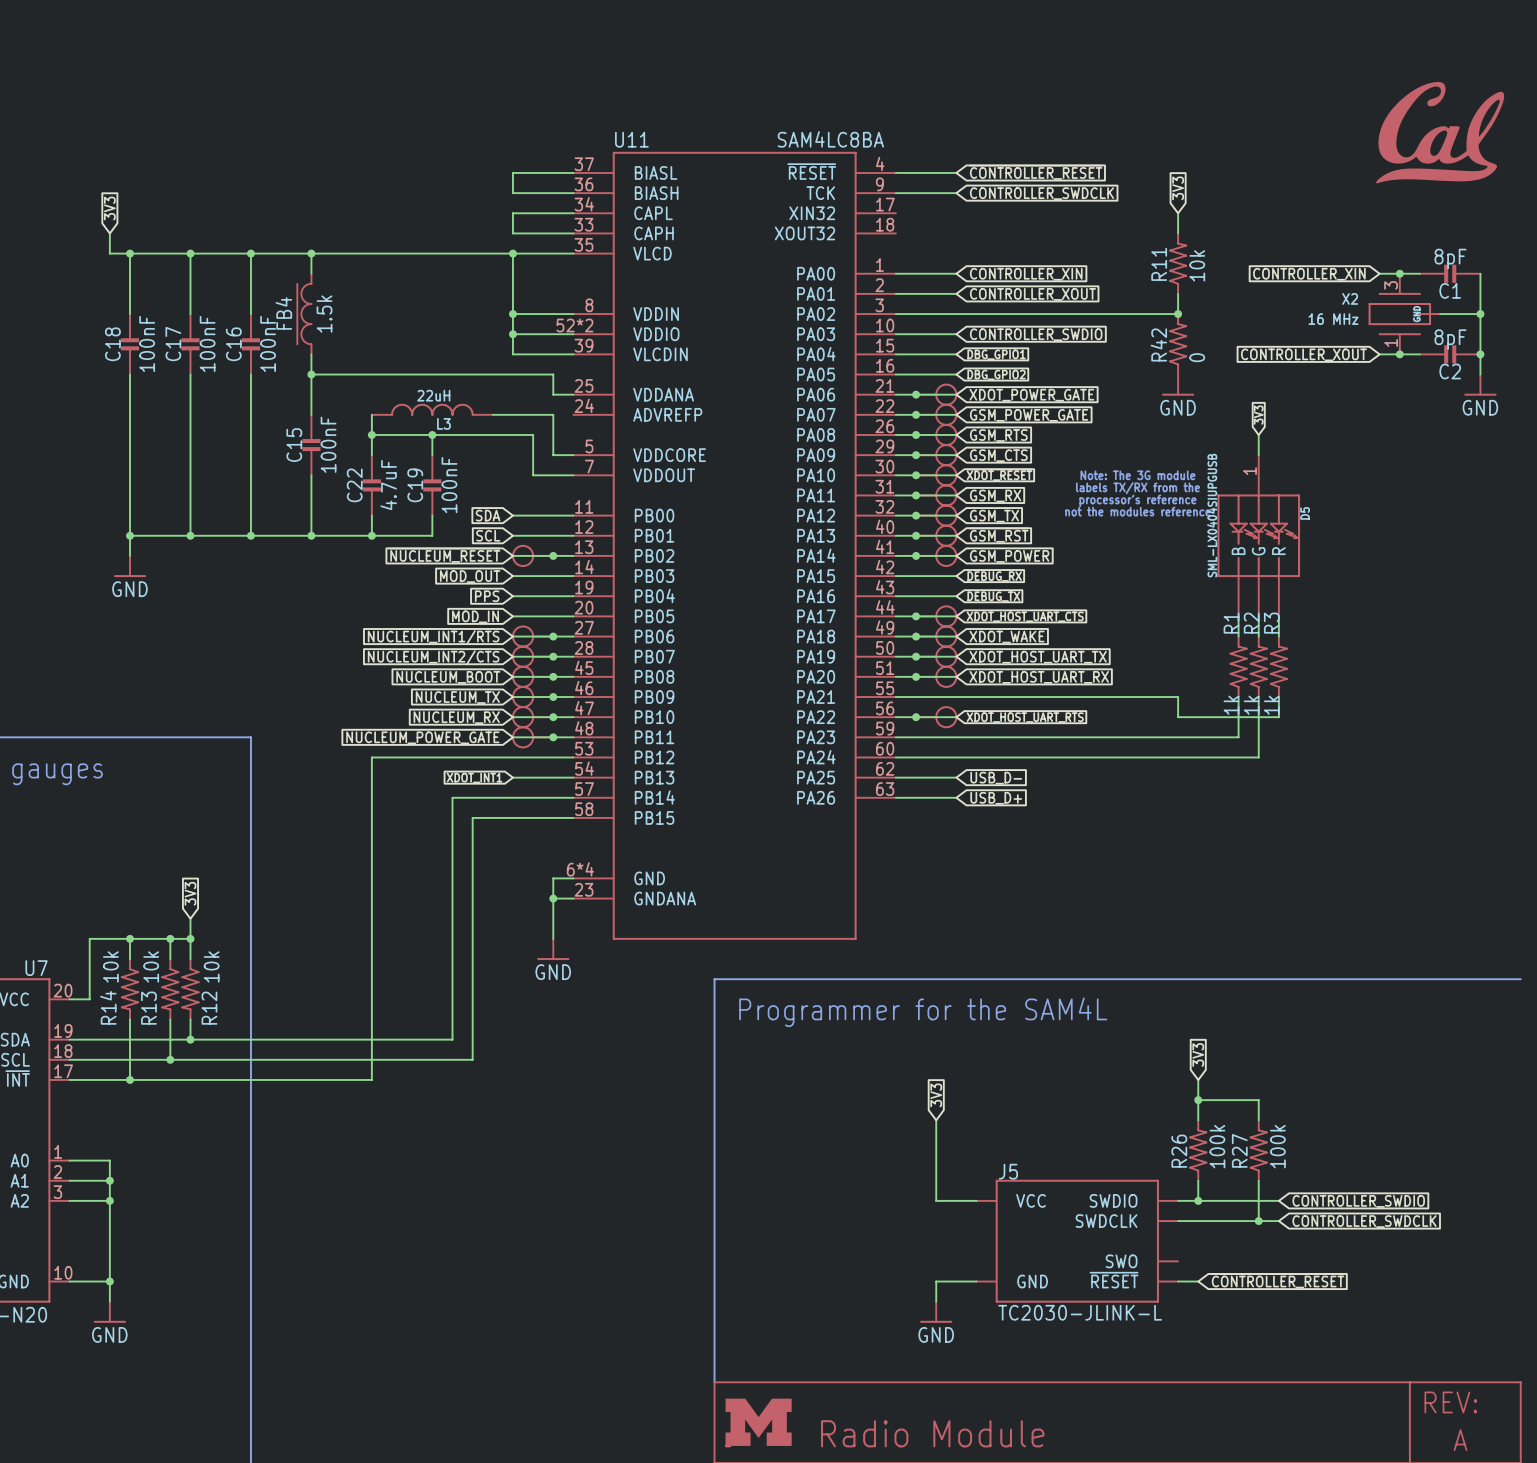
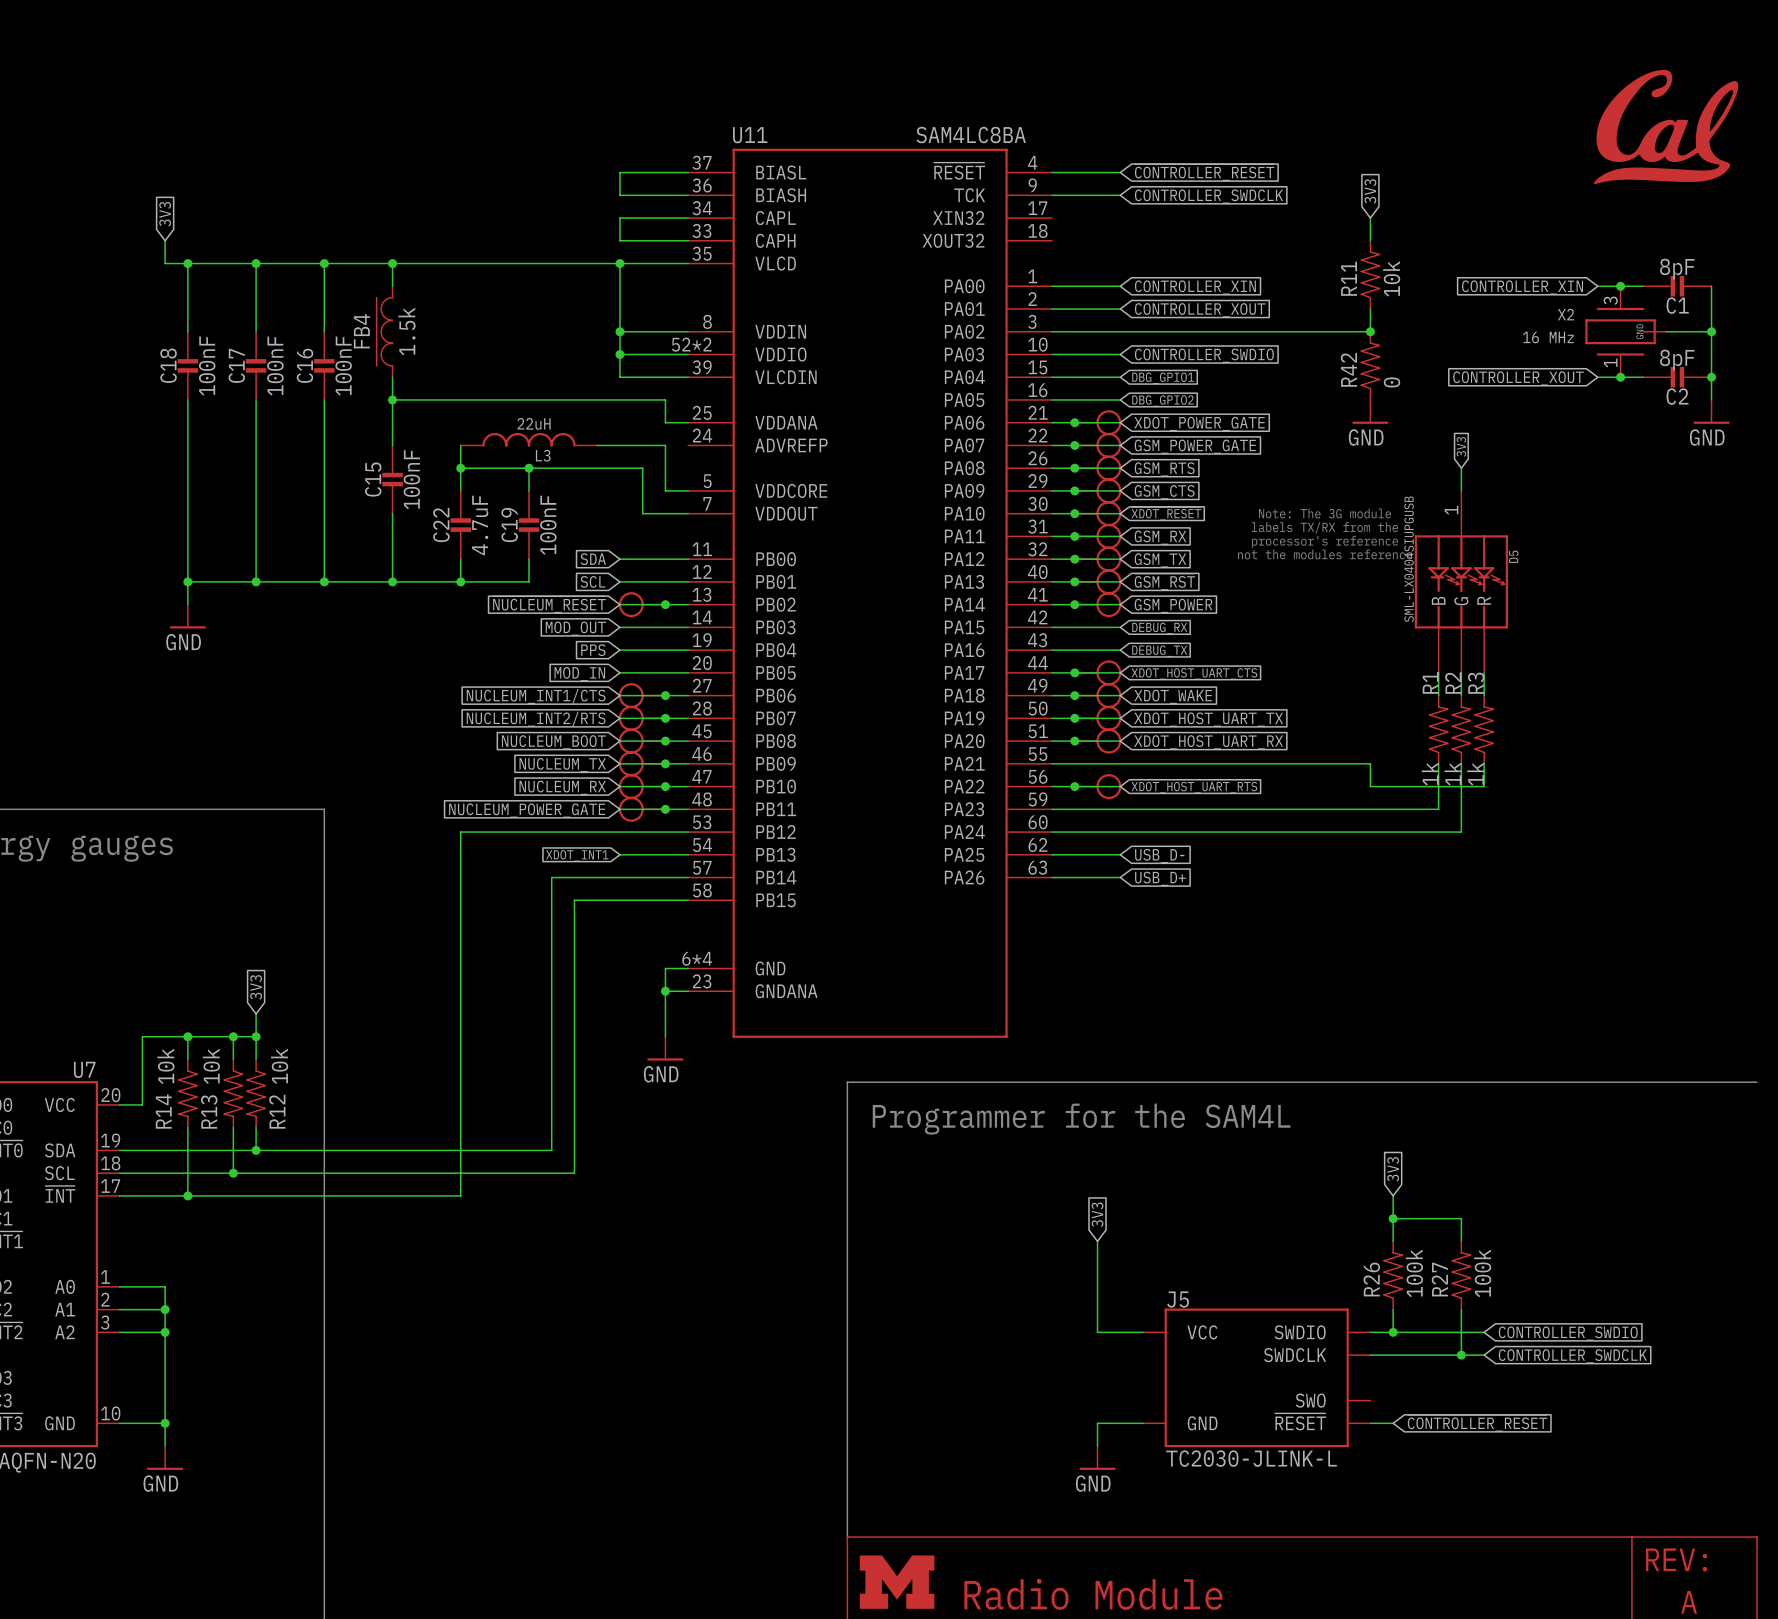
global label: NUCLEUM_INT1/RTS (433, 637) -> NUCLEUM_INT1/CTS (536, 696)
global label: NUCLEUM_INT2/CTS (433, 657) -> NUCLEUM_INT2/RTS (536, 719)

